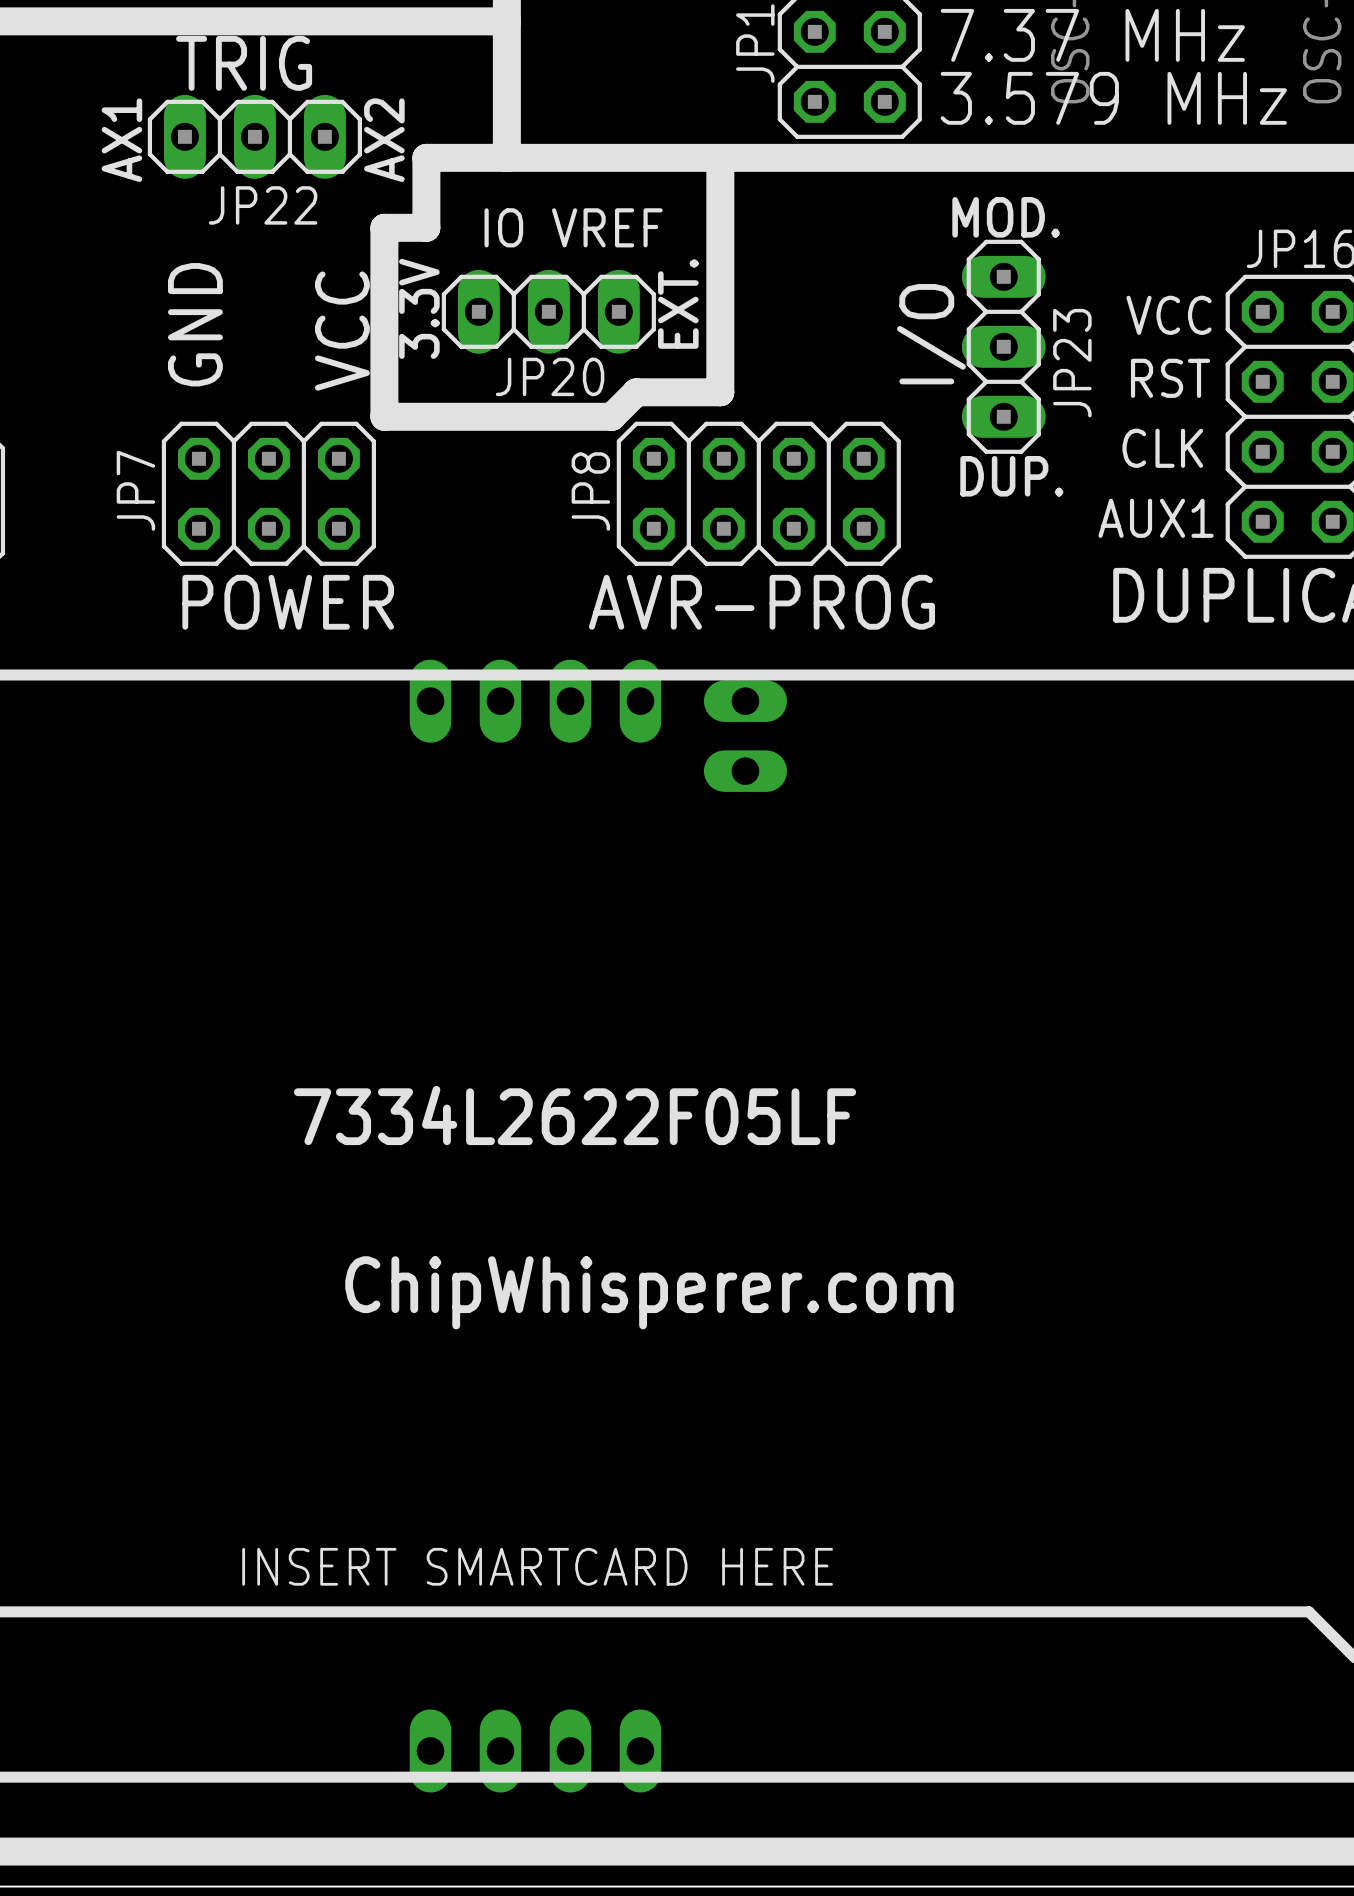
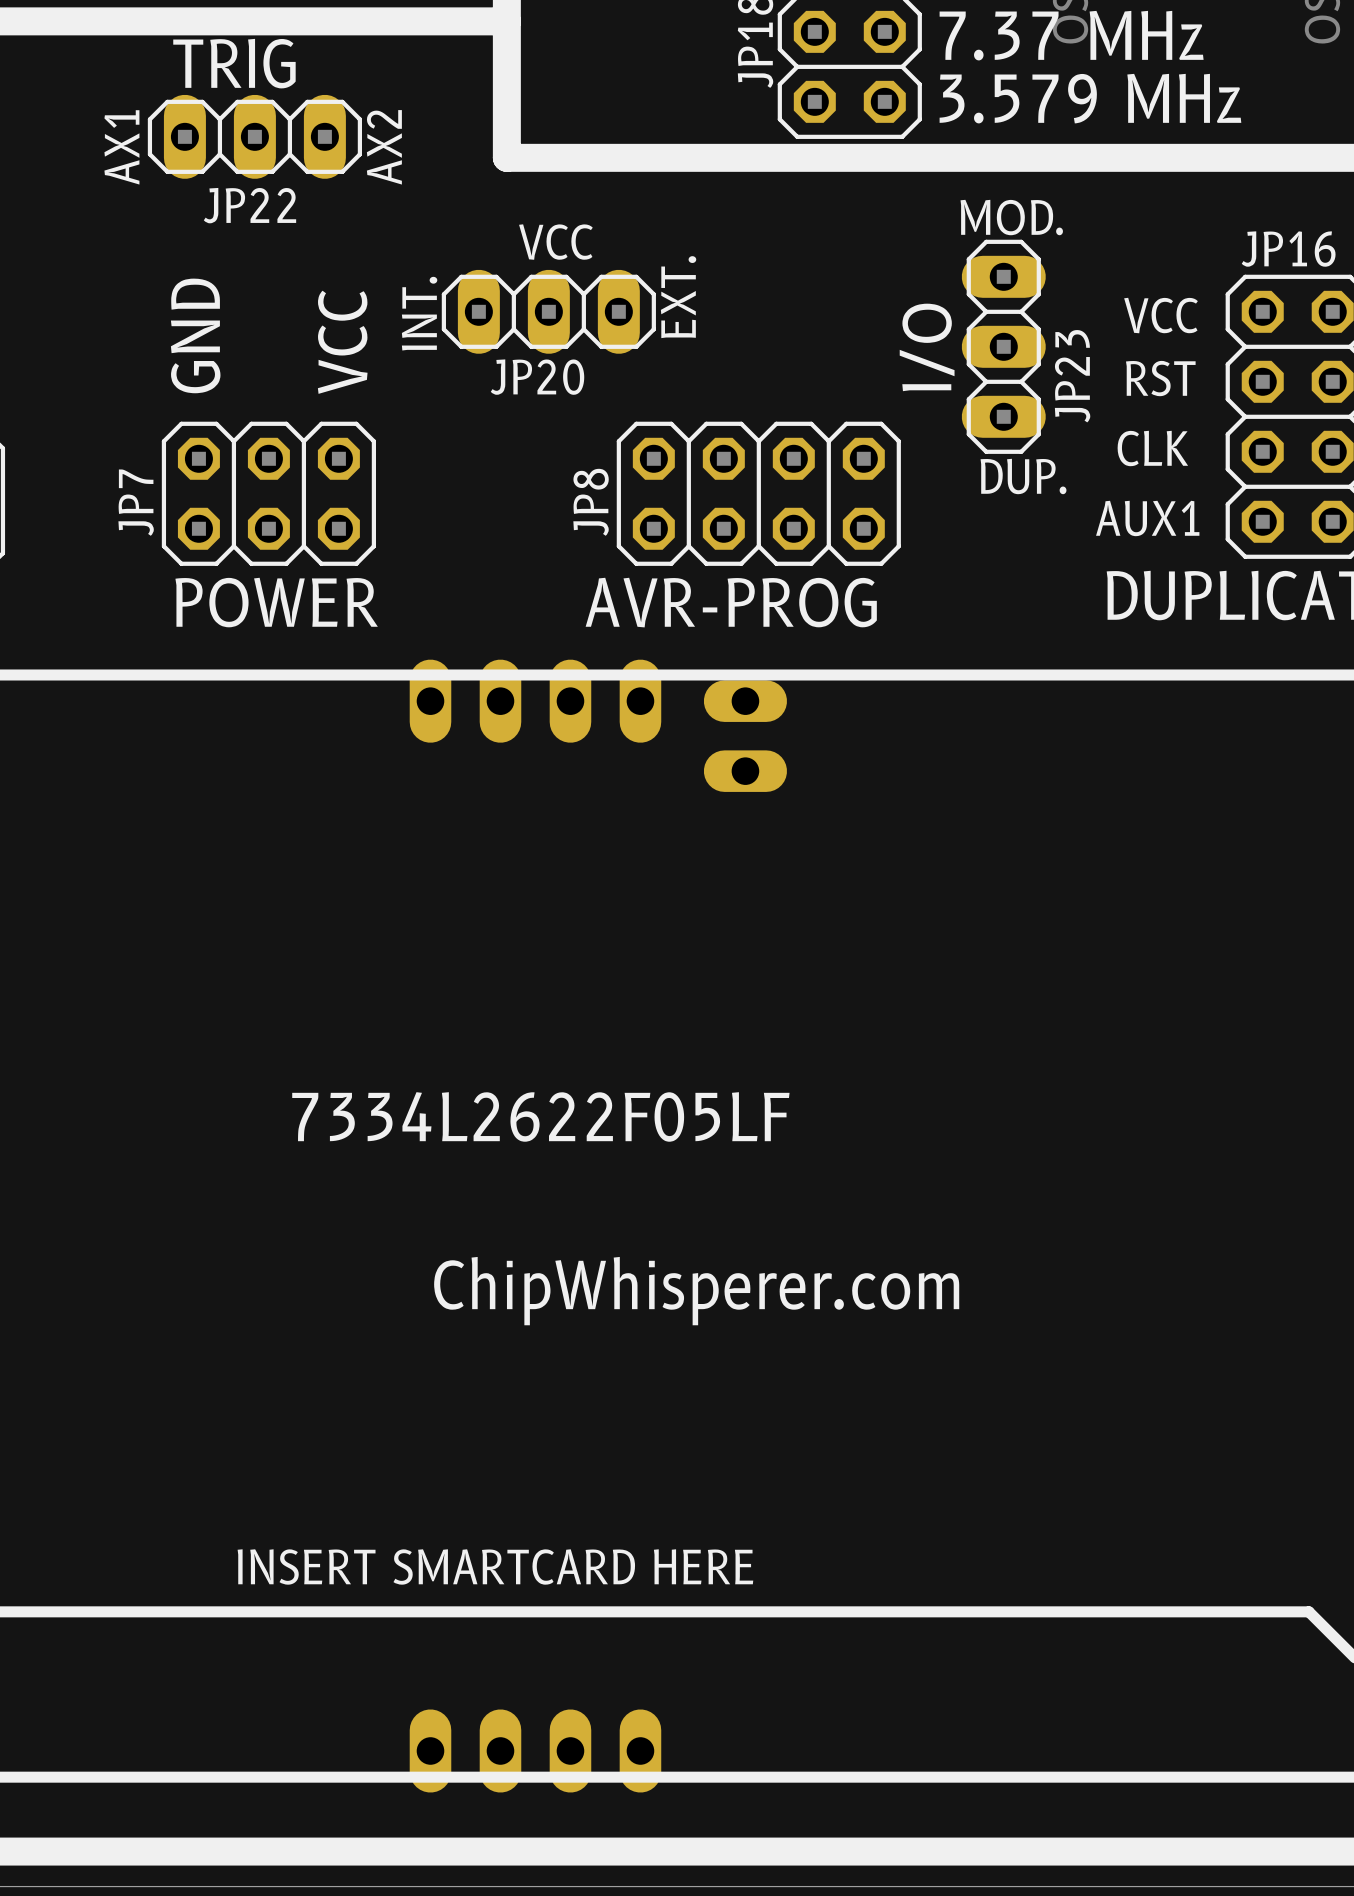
line: (506, 157) (426, 157) (426, 227) (384, 227) (384, 416) (611, 416) (636, 392) (720, 392) (720, 164) -> none
text: IO VREF (573, 227) -> none
text: none -> VCC (555, 242)
text: 3.3V (419, 308) -> INT. (419, 313)

